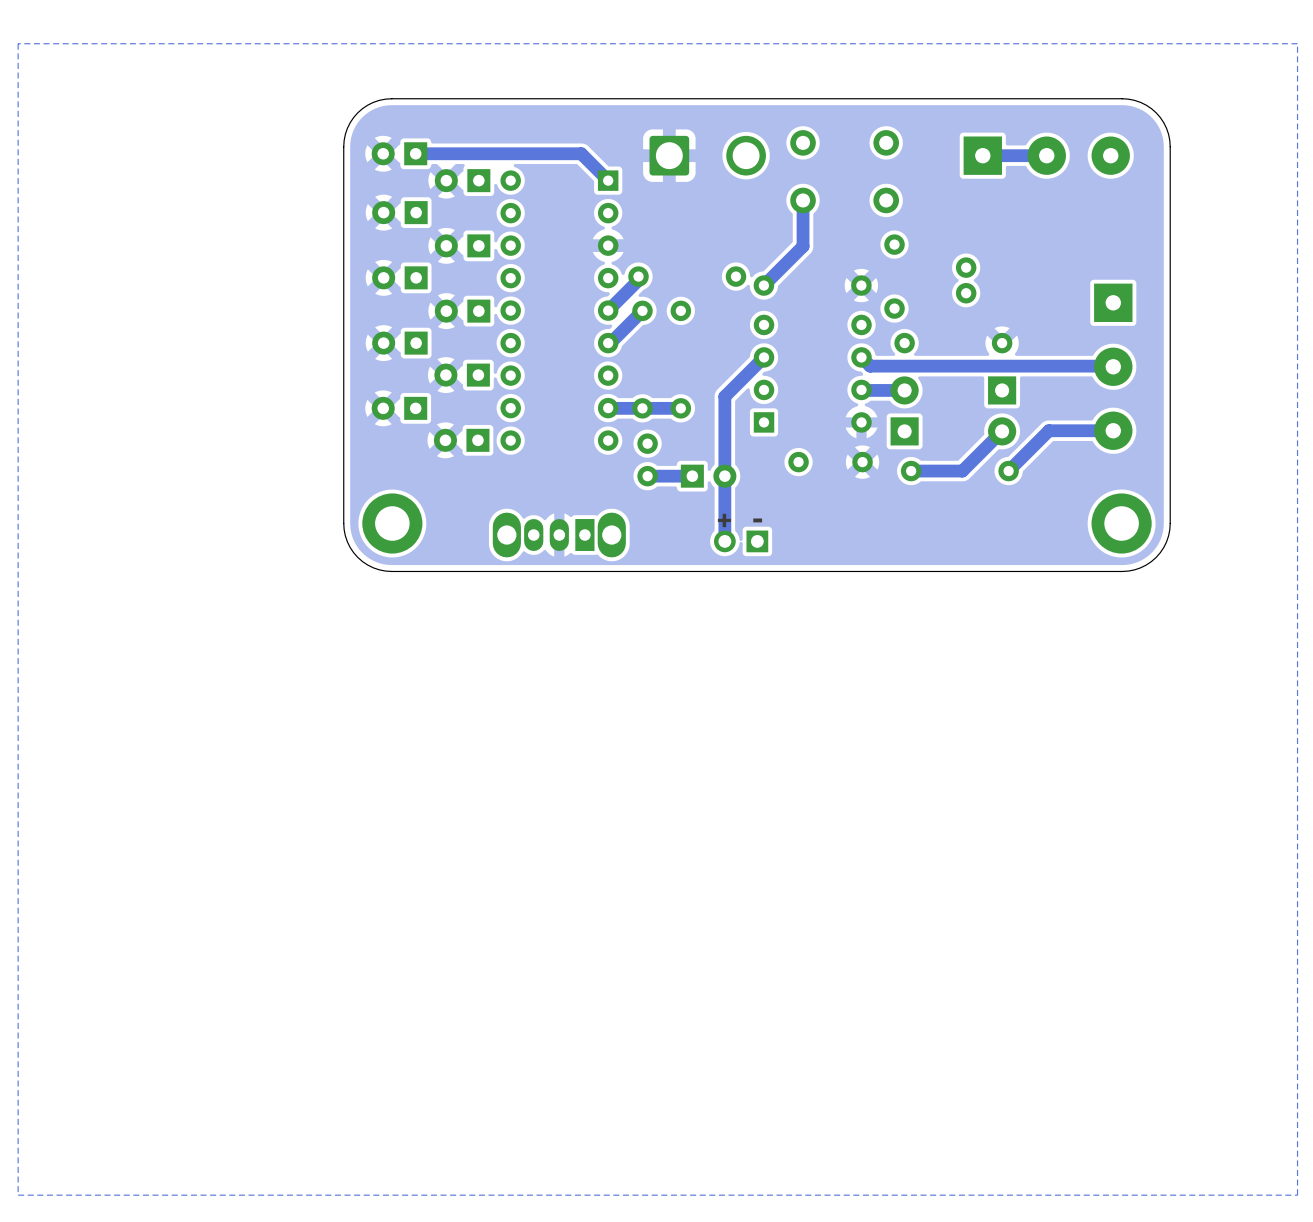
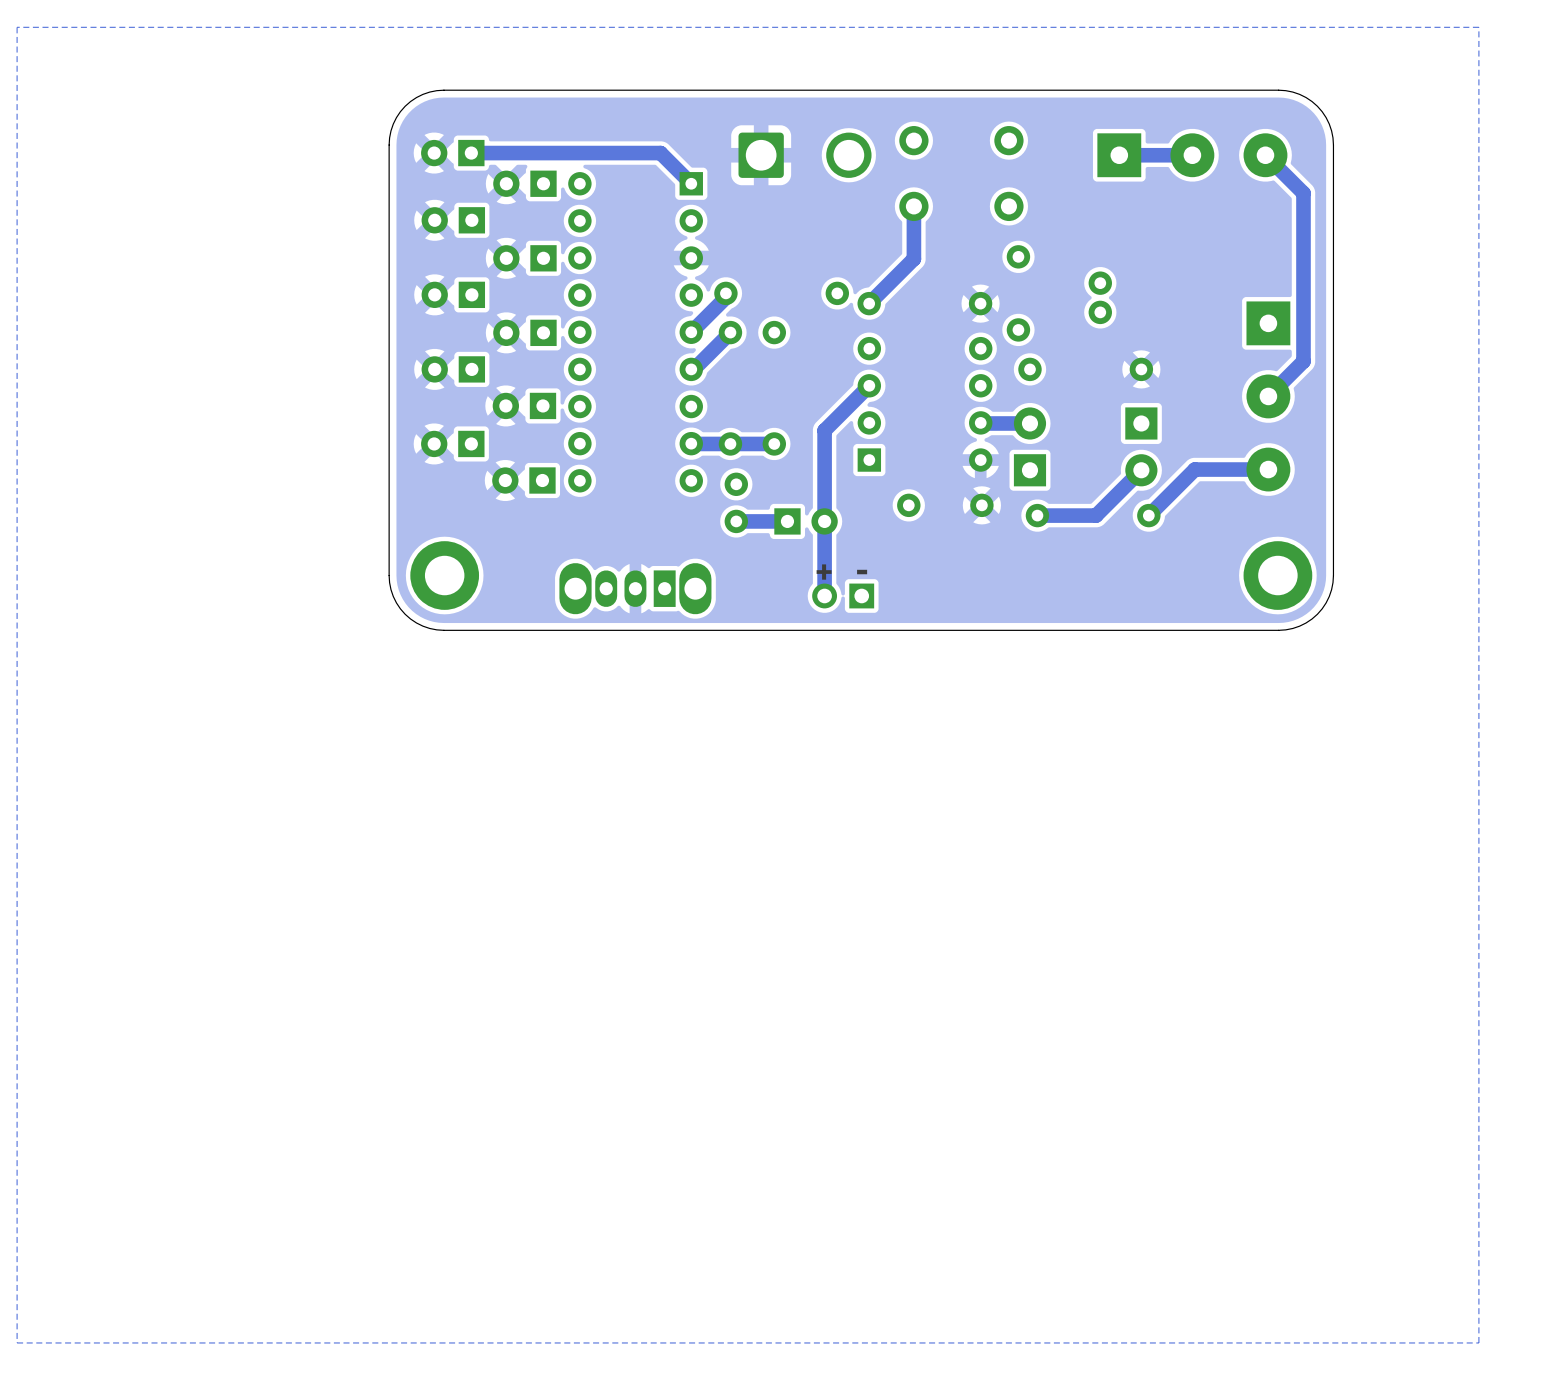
track: (861, 357) (870, 366) (1113, 366) -> (1265, 155) (1303, 193) (1303, 361) (1268, 396)

